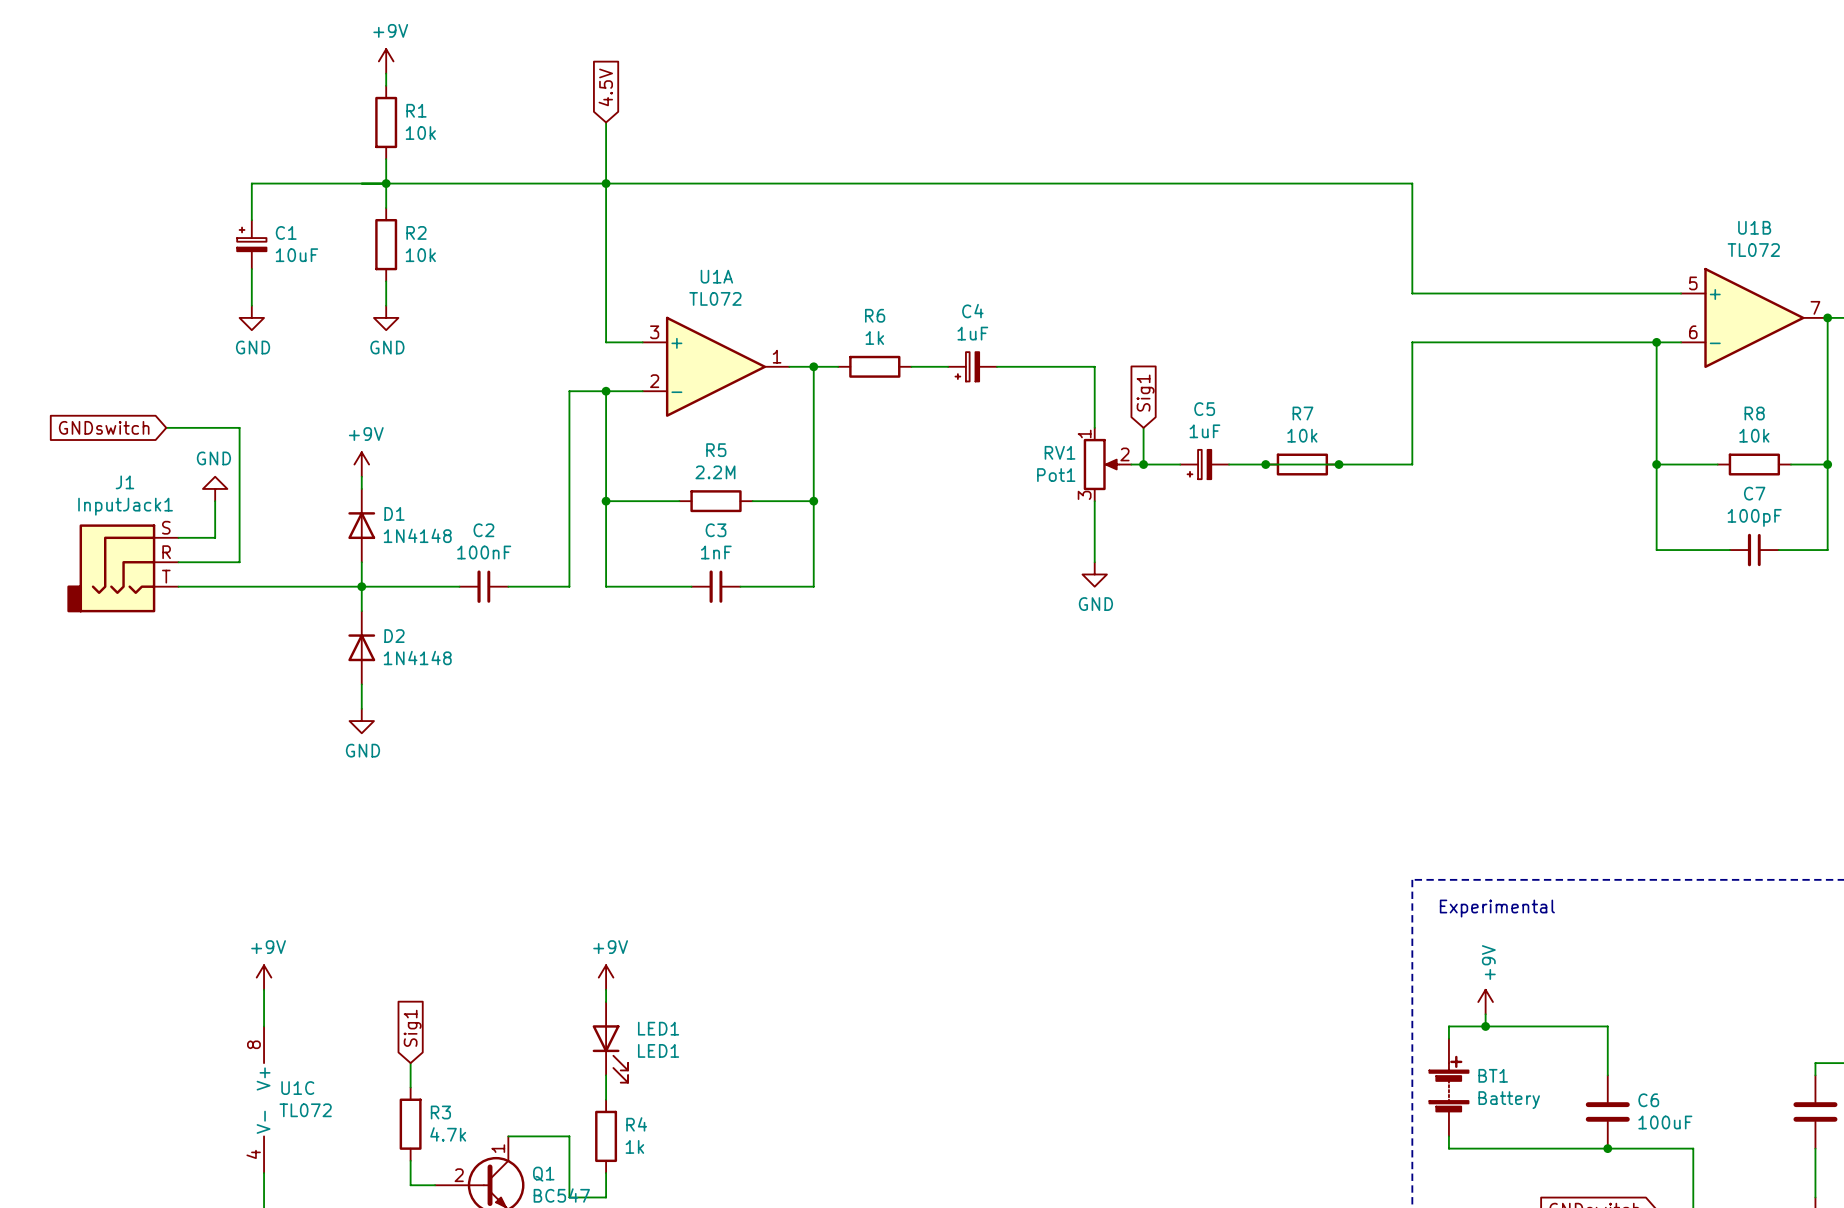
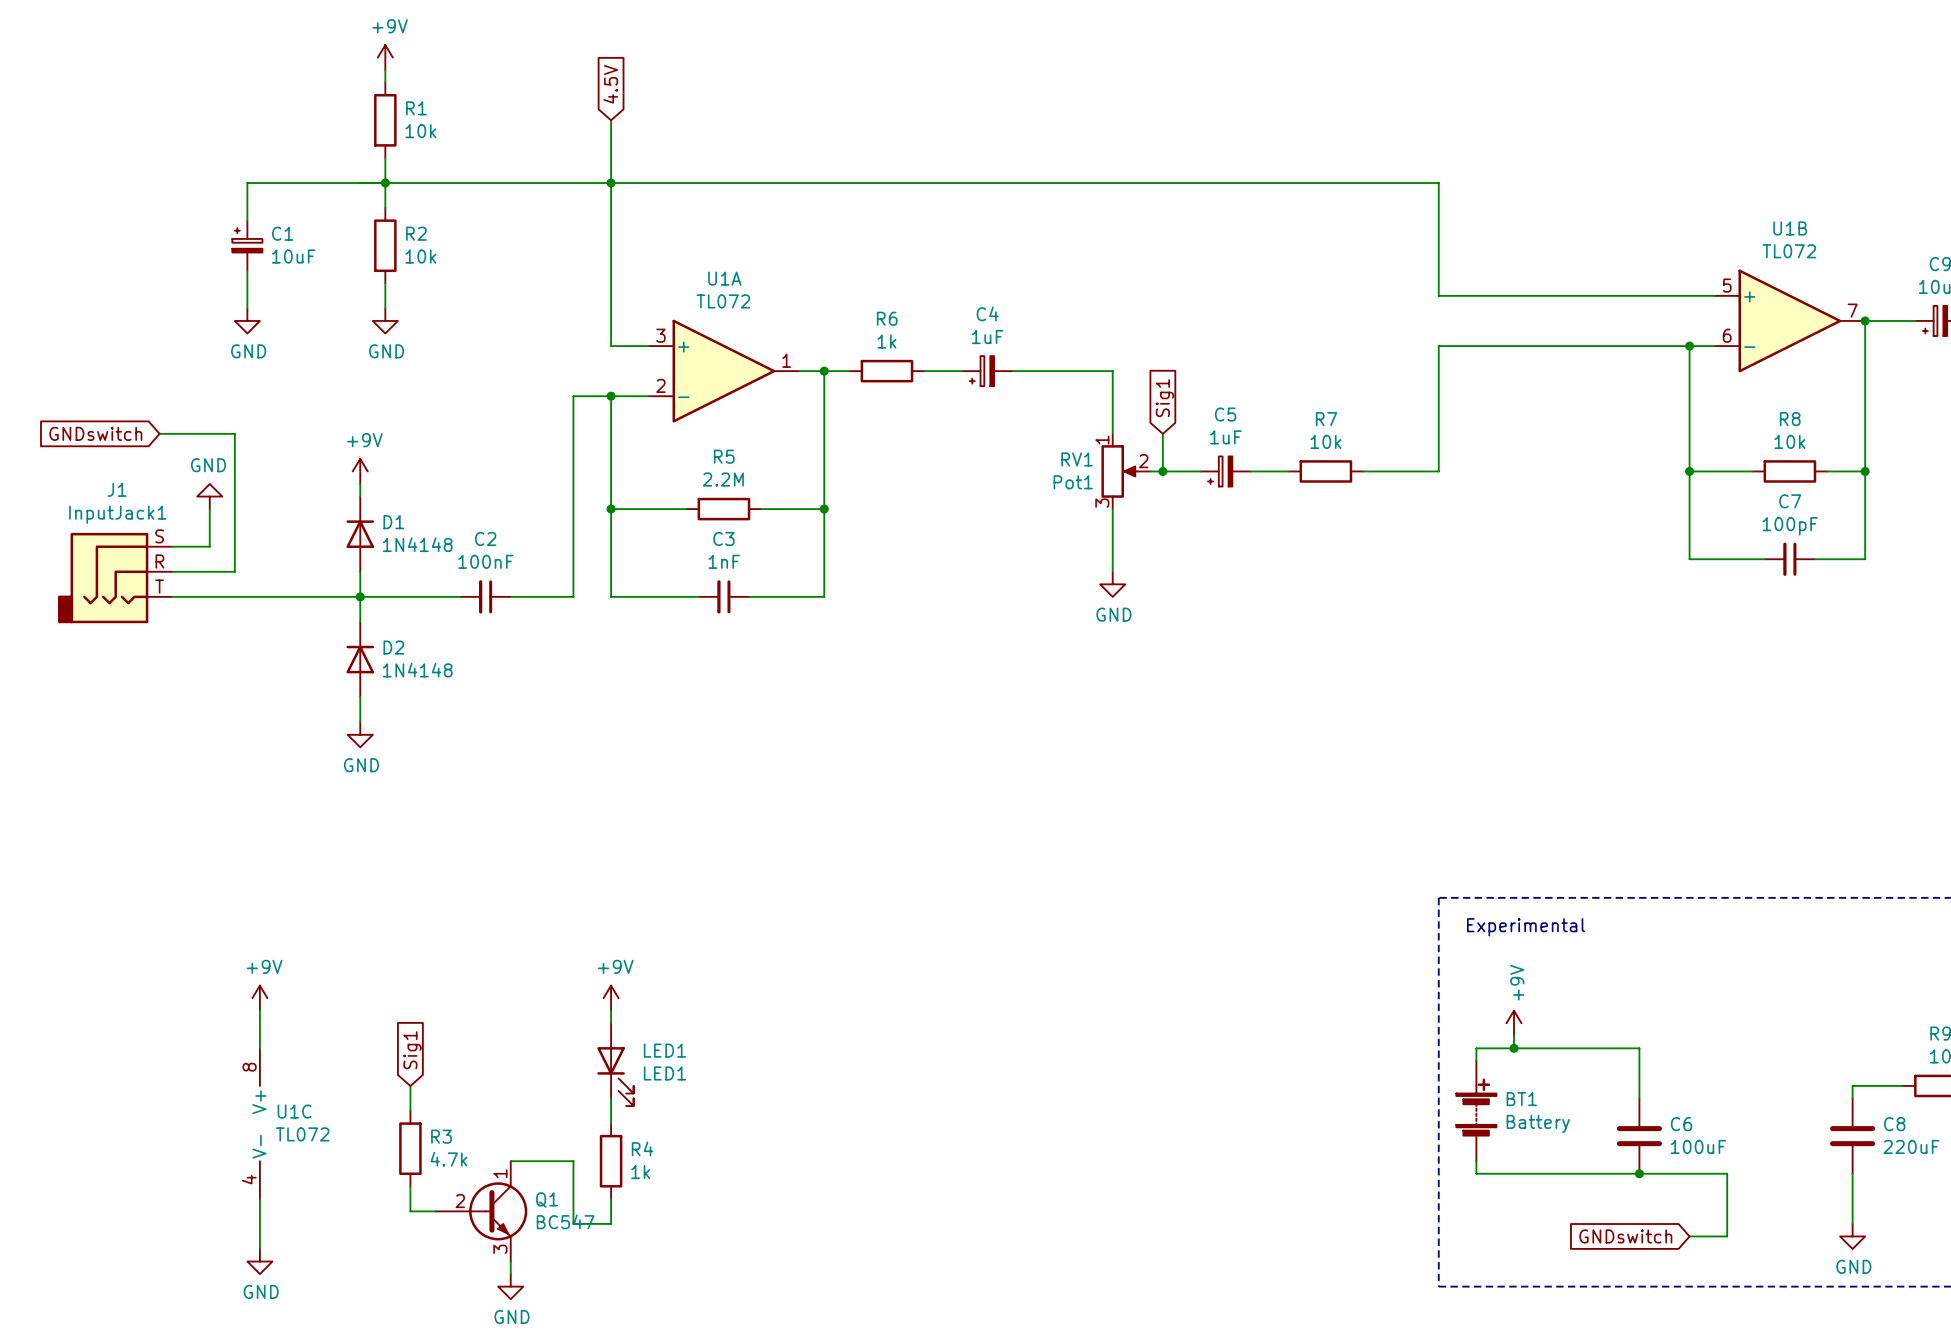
wire: (1265, 464) (1339, 464) -> none
junction: (1265, 464) -> none
junction: (1339, 464) -> none

